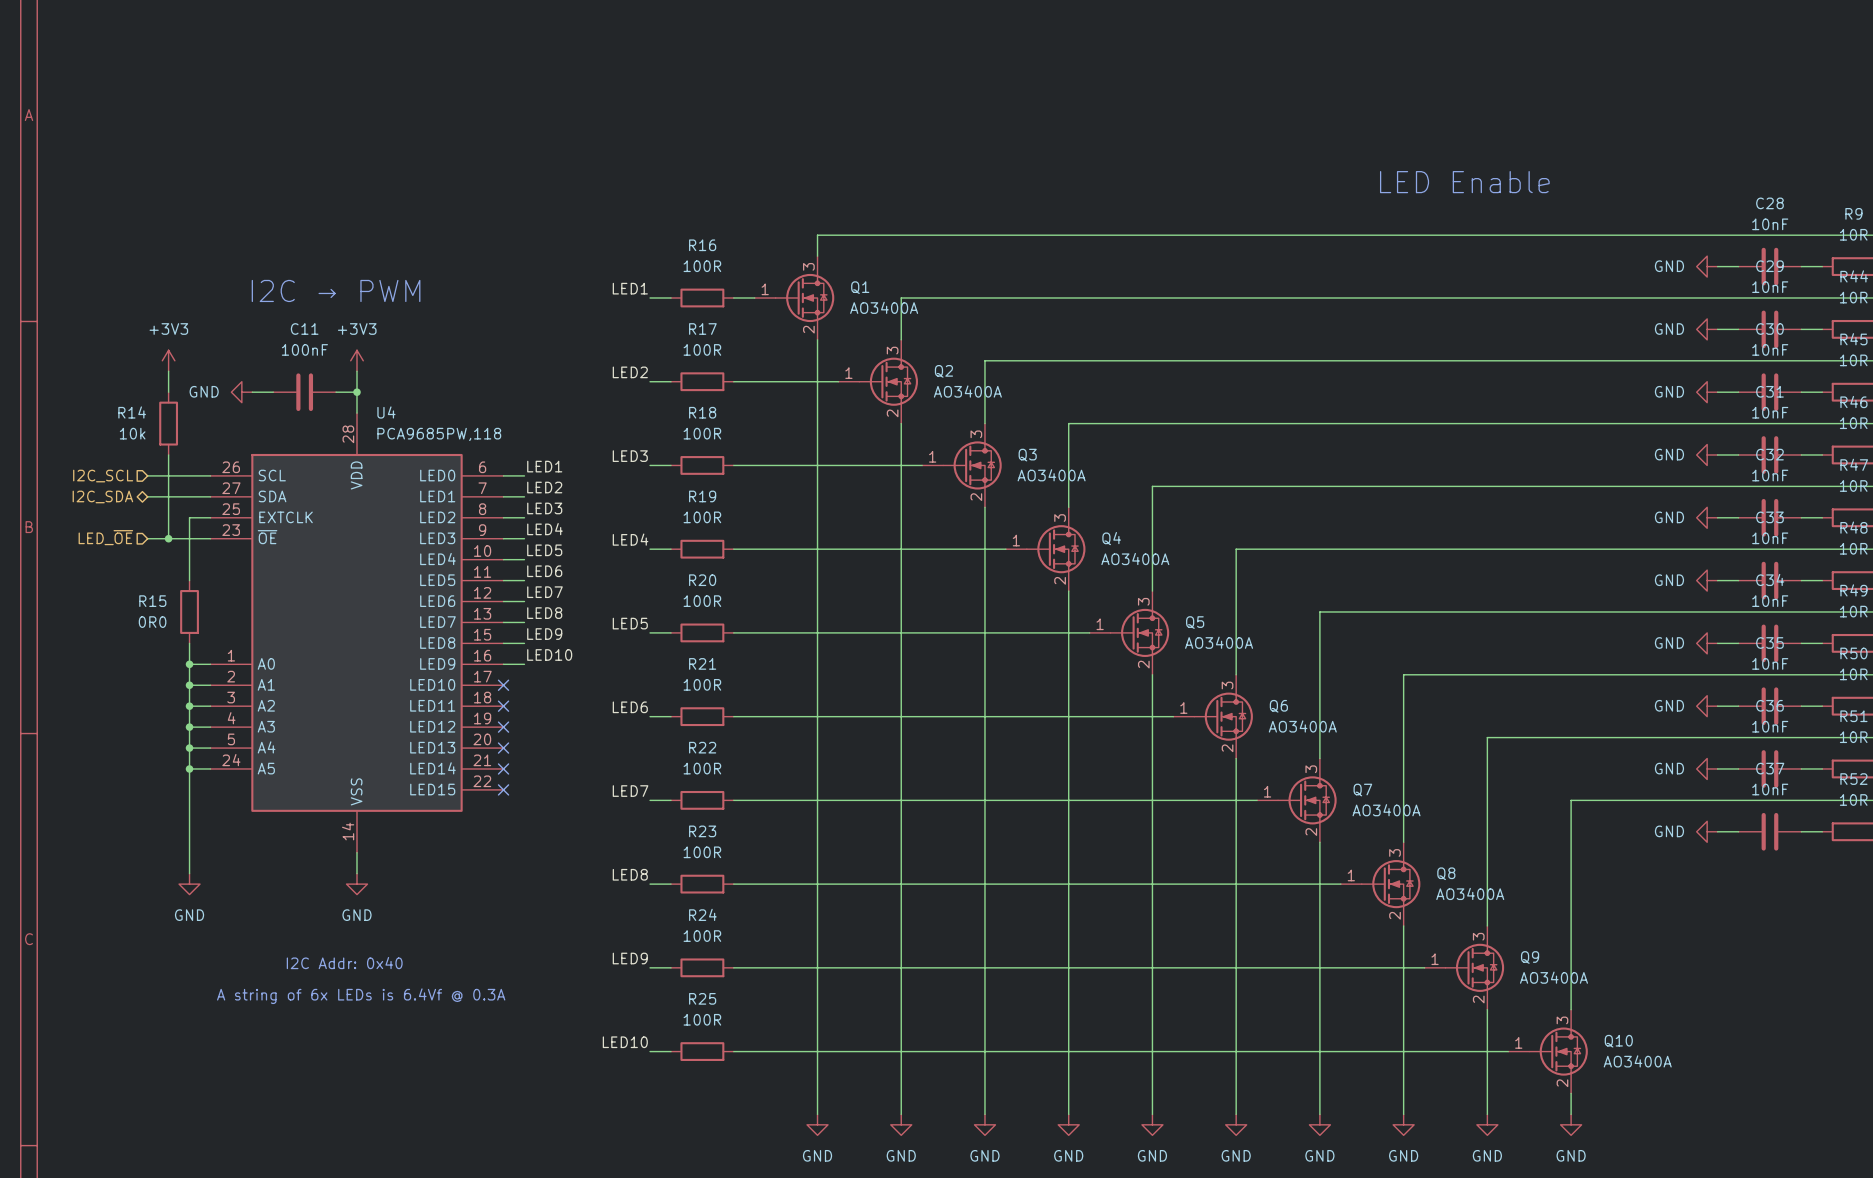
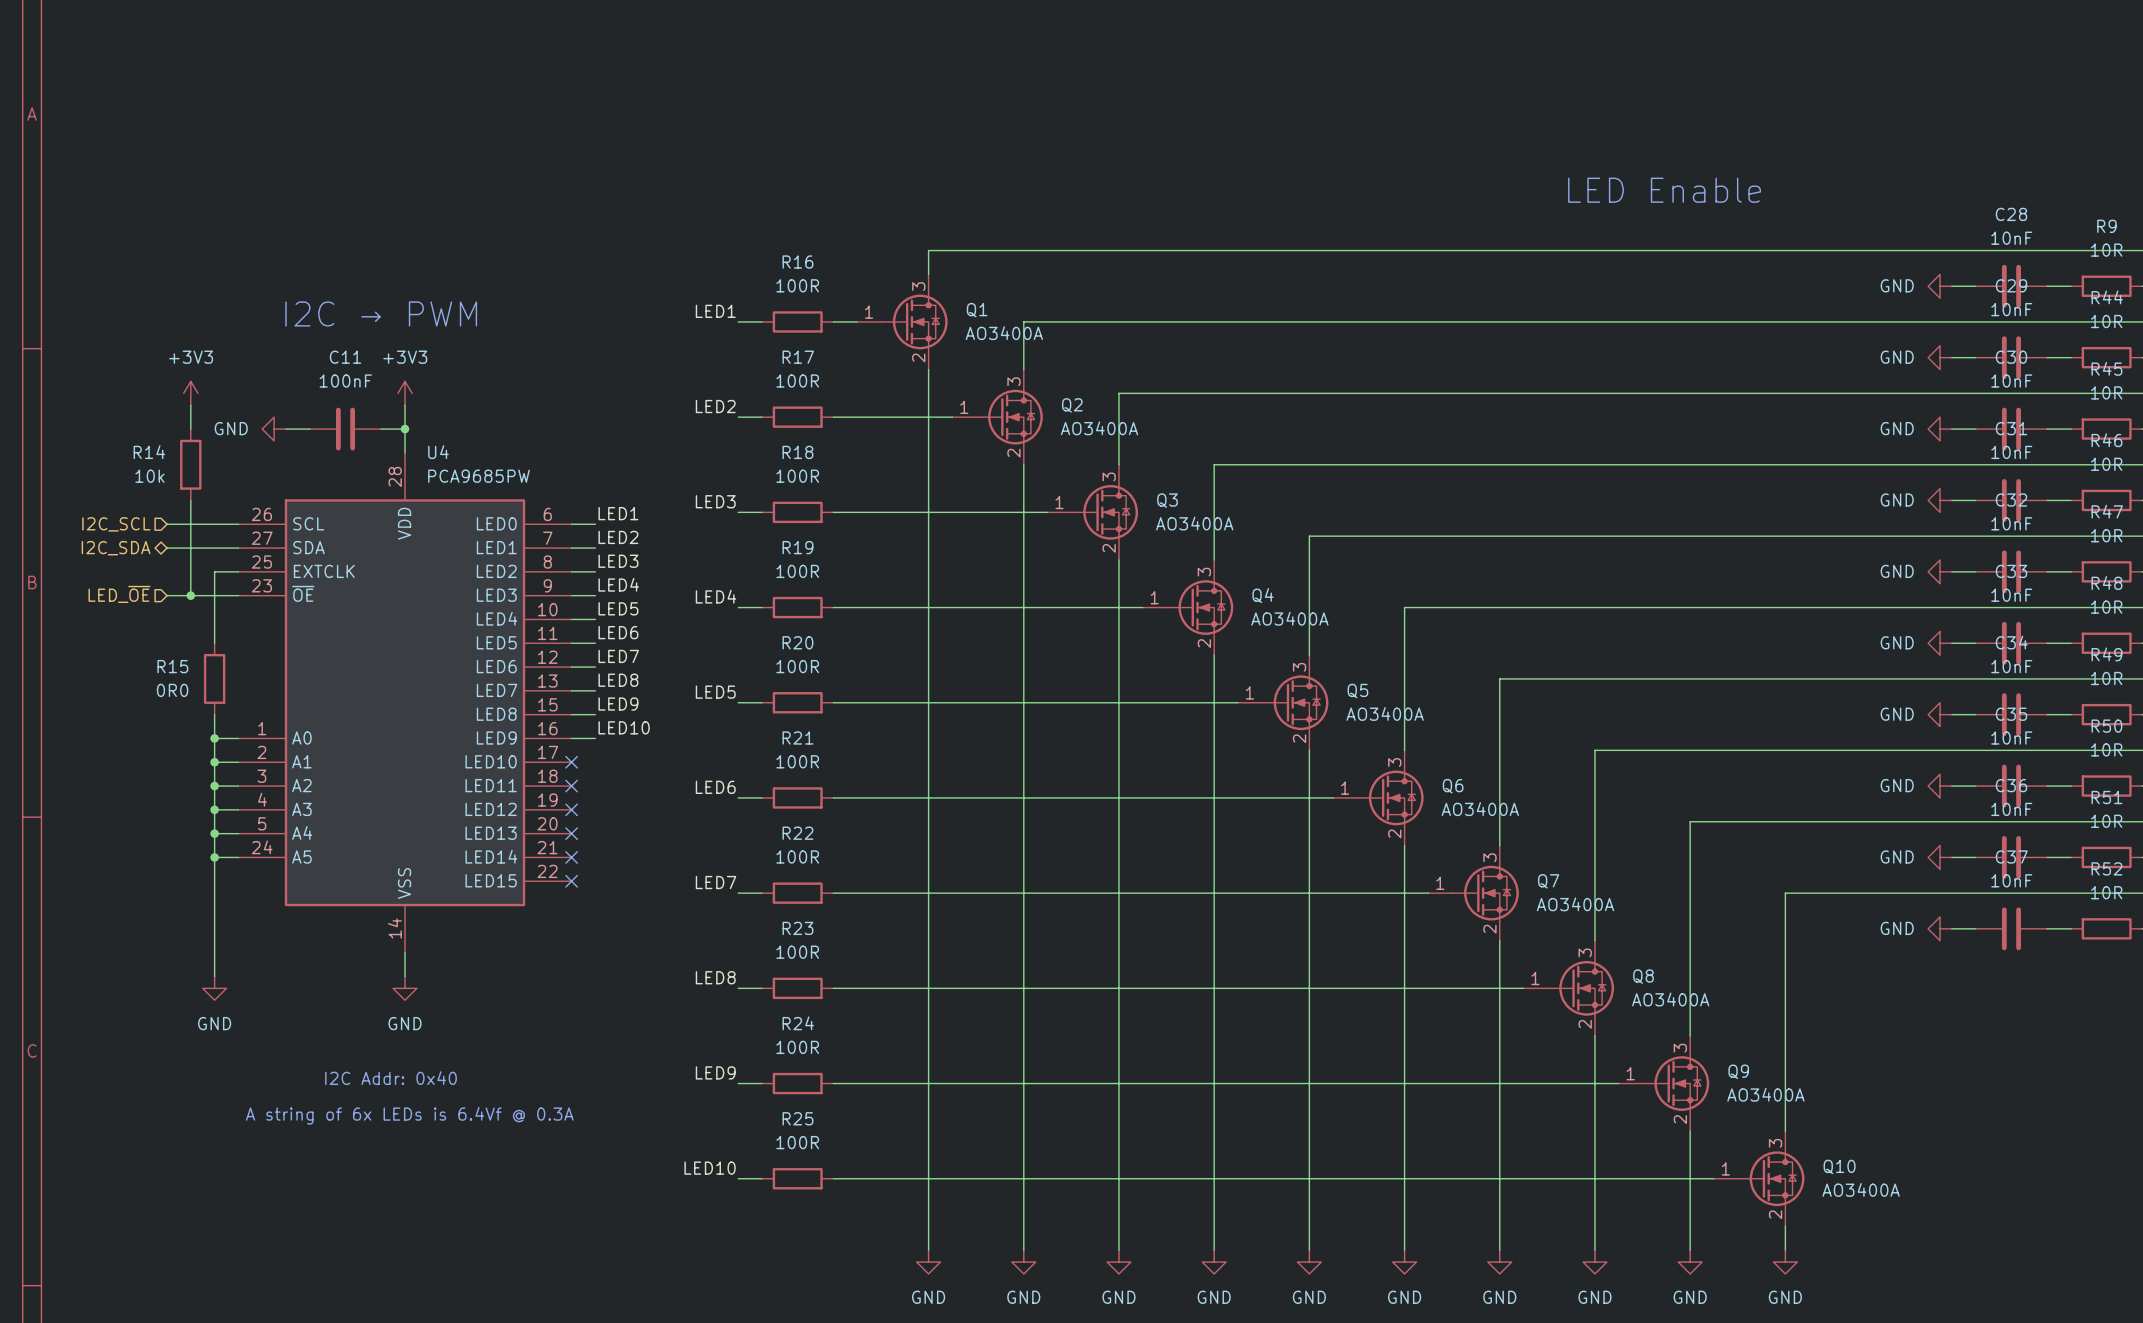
U4 value: PCA9685PW,118 (439, 434) -> PCA9685PW (479, 476)

